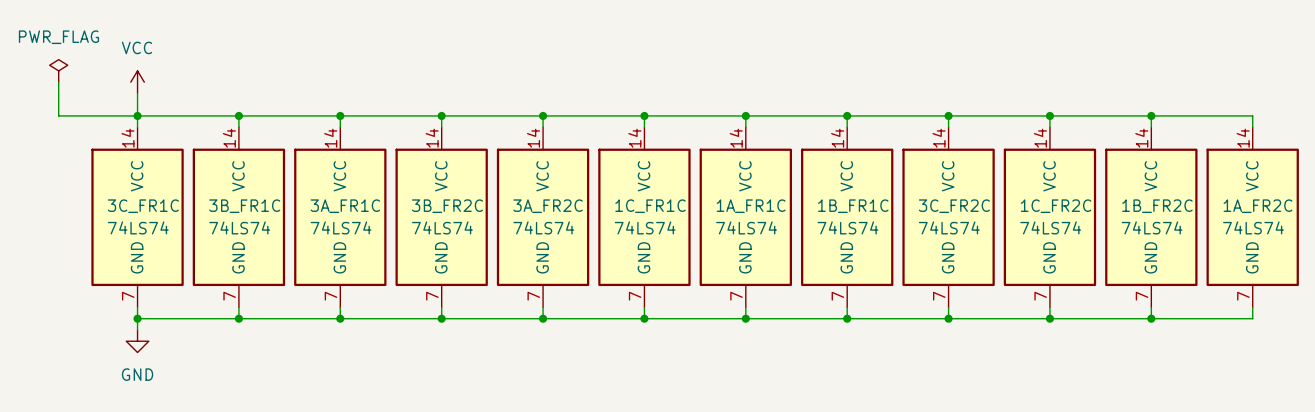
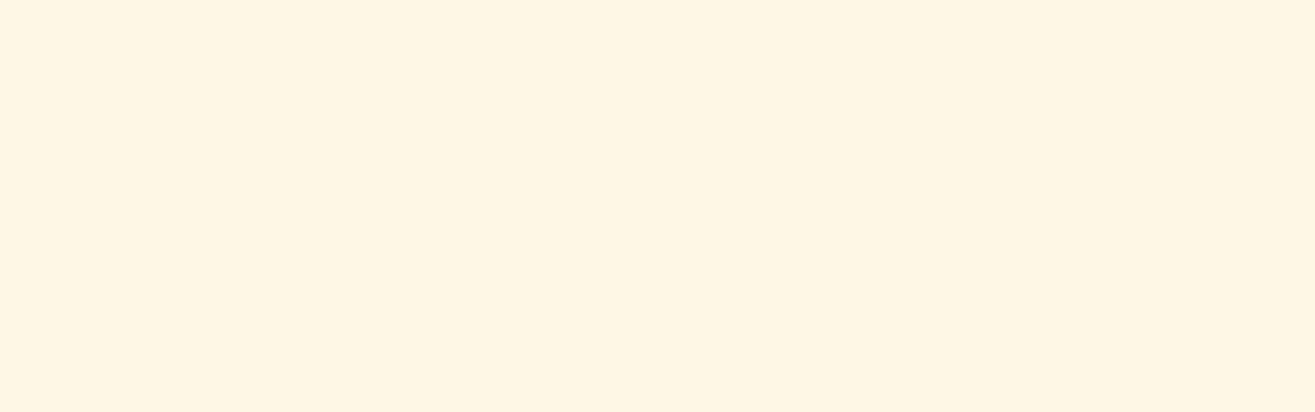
power symbol: PWR_FLAG (58, 70) -> none
wire: (58, 82) (58, 115) (1252, 115) (1252, 127) -> none
power symbol: VCC (137, 82) -> none
wire: (137, 93) (137, 127) -> none
junction: (137, 115) -> none
wire: (238, 115) (238, 127) -> none
junction: (238, 115) -> none
wire: (340, 115) (340, 127) -> none
junction: (340, 115) -> none
wire: (441, 115) (441, 127) -> none
junction: (441, 115) -> none
wire: (543, 115) (543, 127) -> none
junction: (543, 115) -> none
wire: (644, 115) (644, 127) -> none
junction: (644, 115) -> none
wire: (745, 115) (745, 127) -> none
junction: (745, 115) -> none
wire: (847, 115) (847, 127) -> none
junction: (847, 115) -> none
wire: (948, 115) (948, 127) -> none
junction: (948, 115) -> none
wire: (1049, 115) (1049, 127) -> none
junction: (1049, 115) -> none
wire: (1151, 115) (1151, 127) -> none
junction: (1151, 115) -> none
3C_FR1C: 74LS74 (137, 217) -> none
3B_FR1C: 74LS74 (238, 217) -> none
3A_FR1C: 74LS74 (340, 217) -> none
3B_FR2C: 74LS74 (441, 217) -> none
3A_FR2C: 74LS74 (543, 217) -> none
1C_FR1C: 74LS74 (644, 217) -> none
1A_FR1C: 74LS74 (745, 217) -> none
1B_FR1C: 74LS74 (847, 217) -> none
3C_FR2C: 74LS74 (948, 217) -> none
1C_FR2C: 74LS74 (1049, 217) -> none
1B_FR2C: 74LS74 (1151, 217) -> none
1A_FR2C: 74LS74 (1252, 217) -> none
wire: (137, 307) (137, 329) -> none
wire: (238, 307) (238, 318) -> none
wire: (340, 307) (340, 318) -> none
wire: (441, 307) (441, 318) -> none
wire: (543, 307) (543, 318) -> none
wire: (644, 307) (644, 318) -> none
wire: (745, 307) (745, 318) -> none
wire: (847, 307) (847, 318) -> none
wire: (948, 307) (948, 318) -> none
wire: (1049, 307) (1049, 318) -> none
wire: (1151, 307) (1151, 318) -> none
wire: (1252, 307) (1252, 318) (137, 318) -> none
junction: (137, 318) -> none
junction: (238, 318) -> none
junction: (340, 318) -> none
junction: (441, 318) -> none
junction: (543, 318) -> none
junction: (644, 318) -> none
junction: (745, 318) -> none
junction: (847, 318) -> none
junction: (948, 318) -> none
junction: (1049, 318) -> none
junction: (1151, 318) -> none
power symbol: GND (137, 341) -> none

